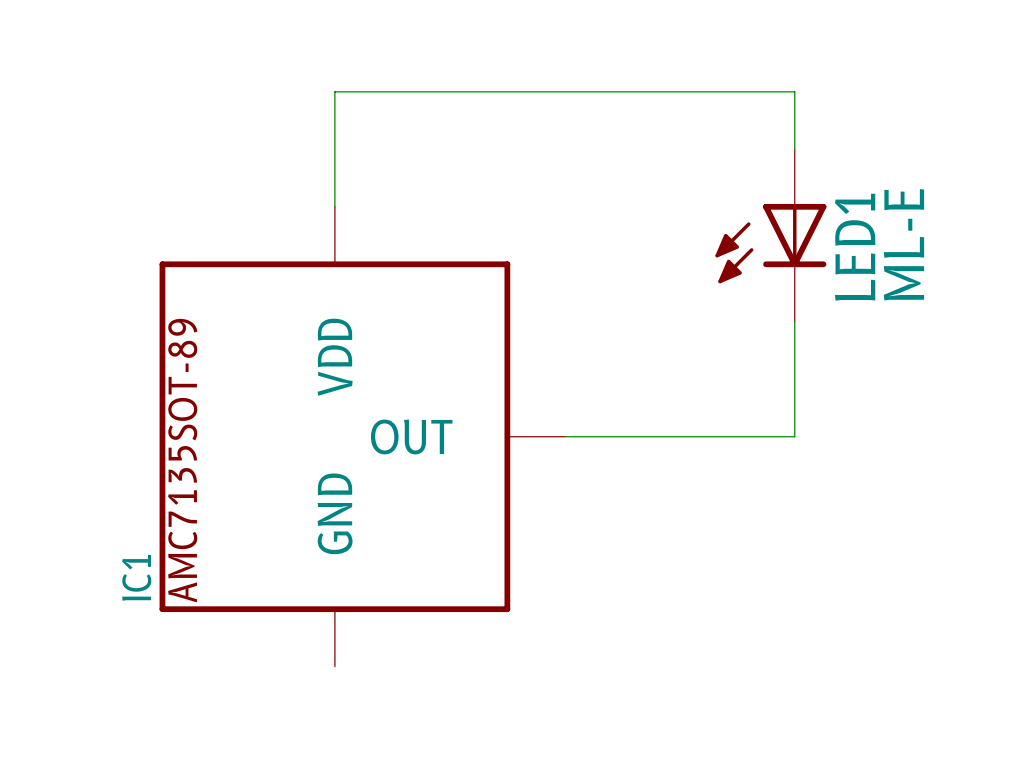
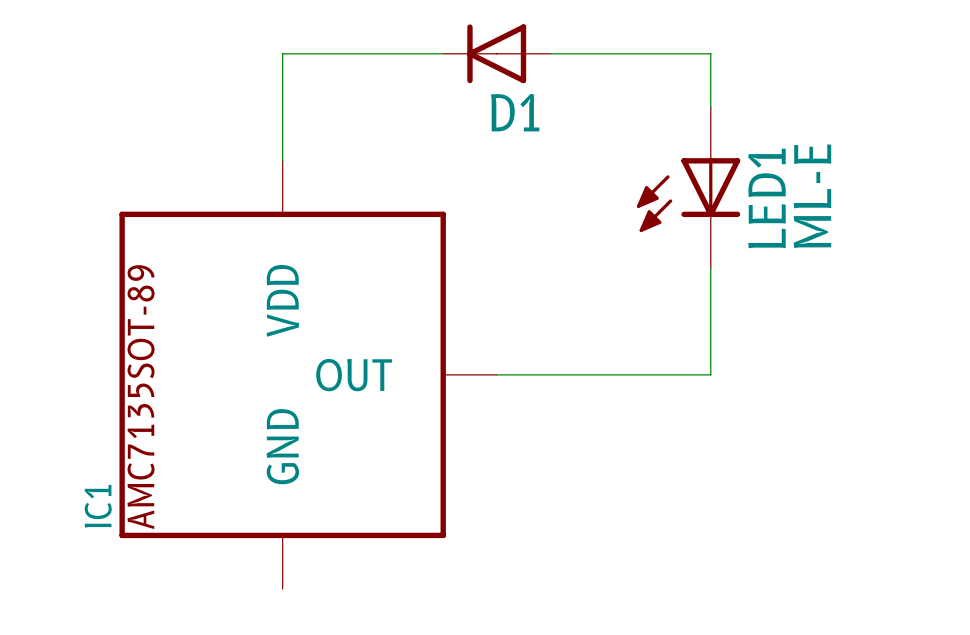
D1: none -> (496, 53)

